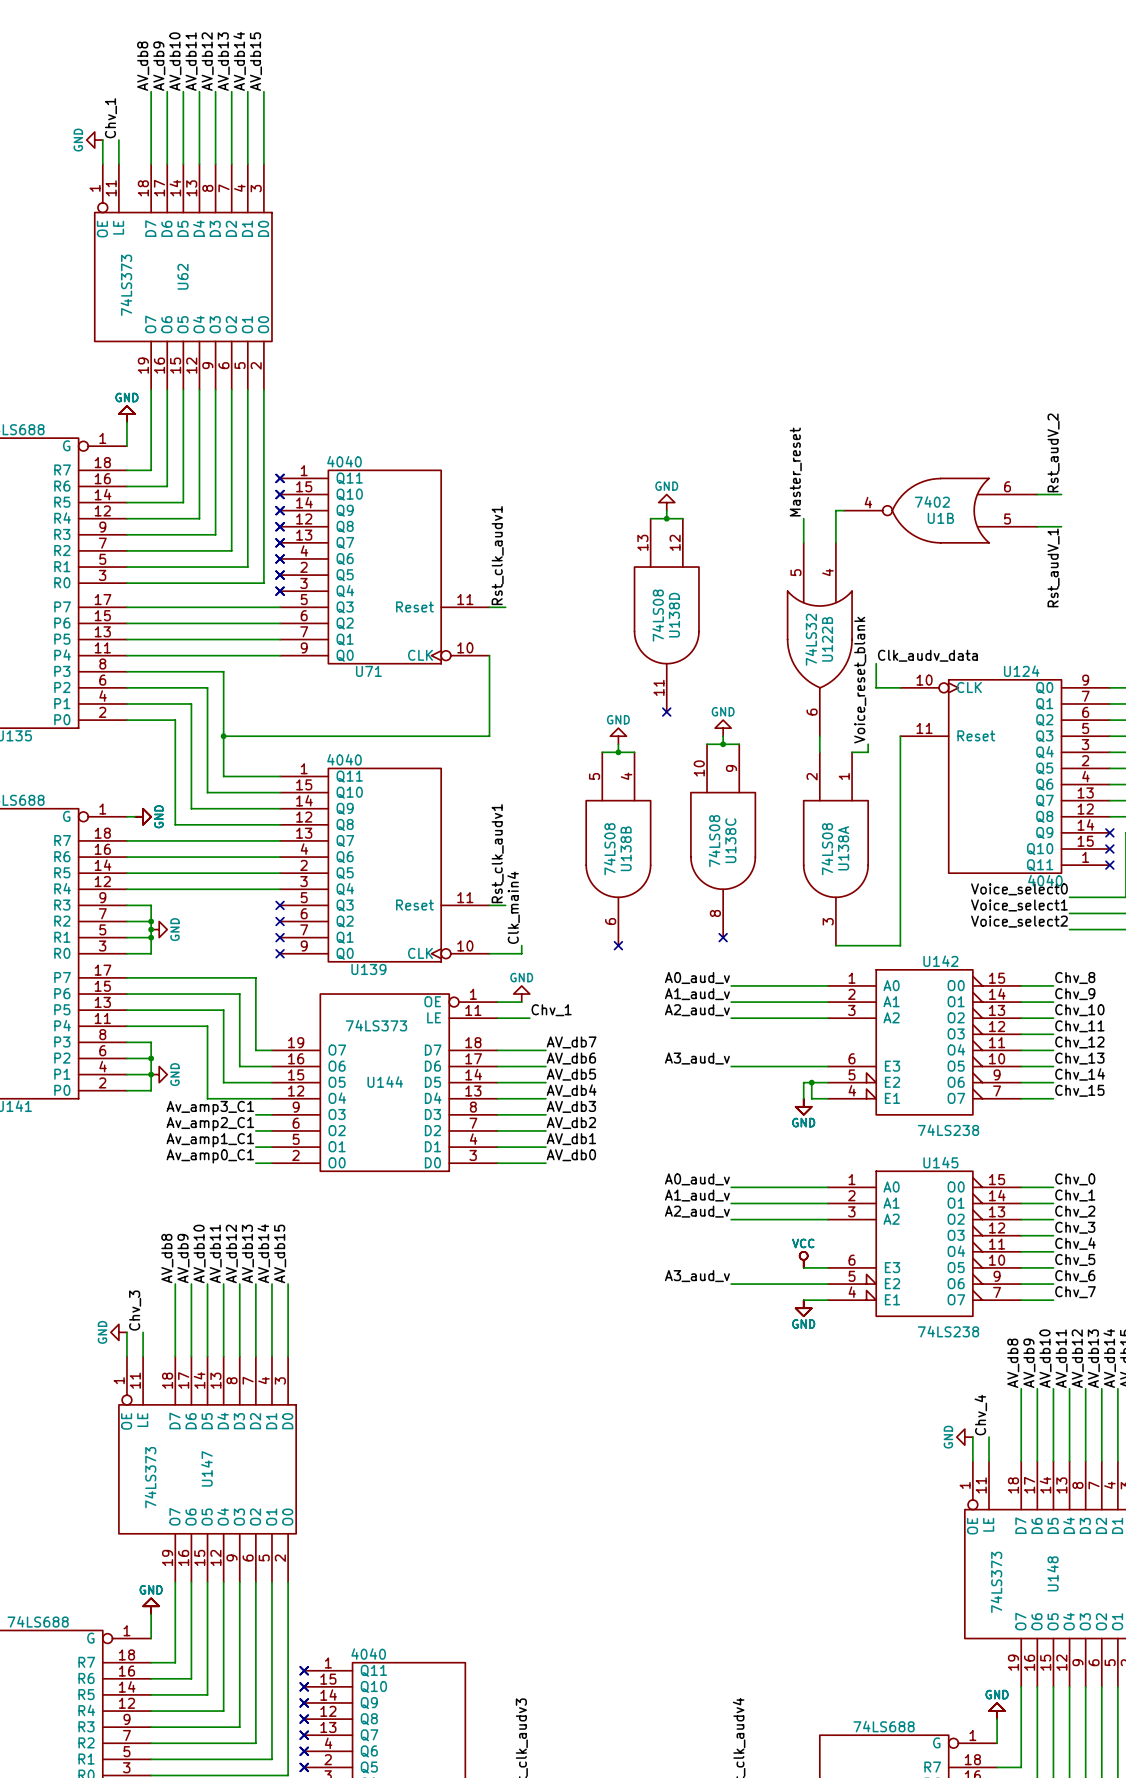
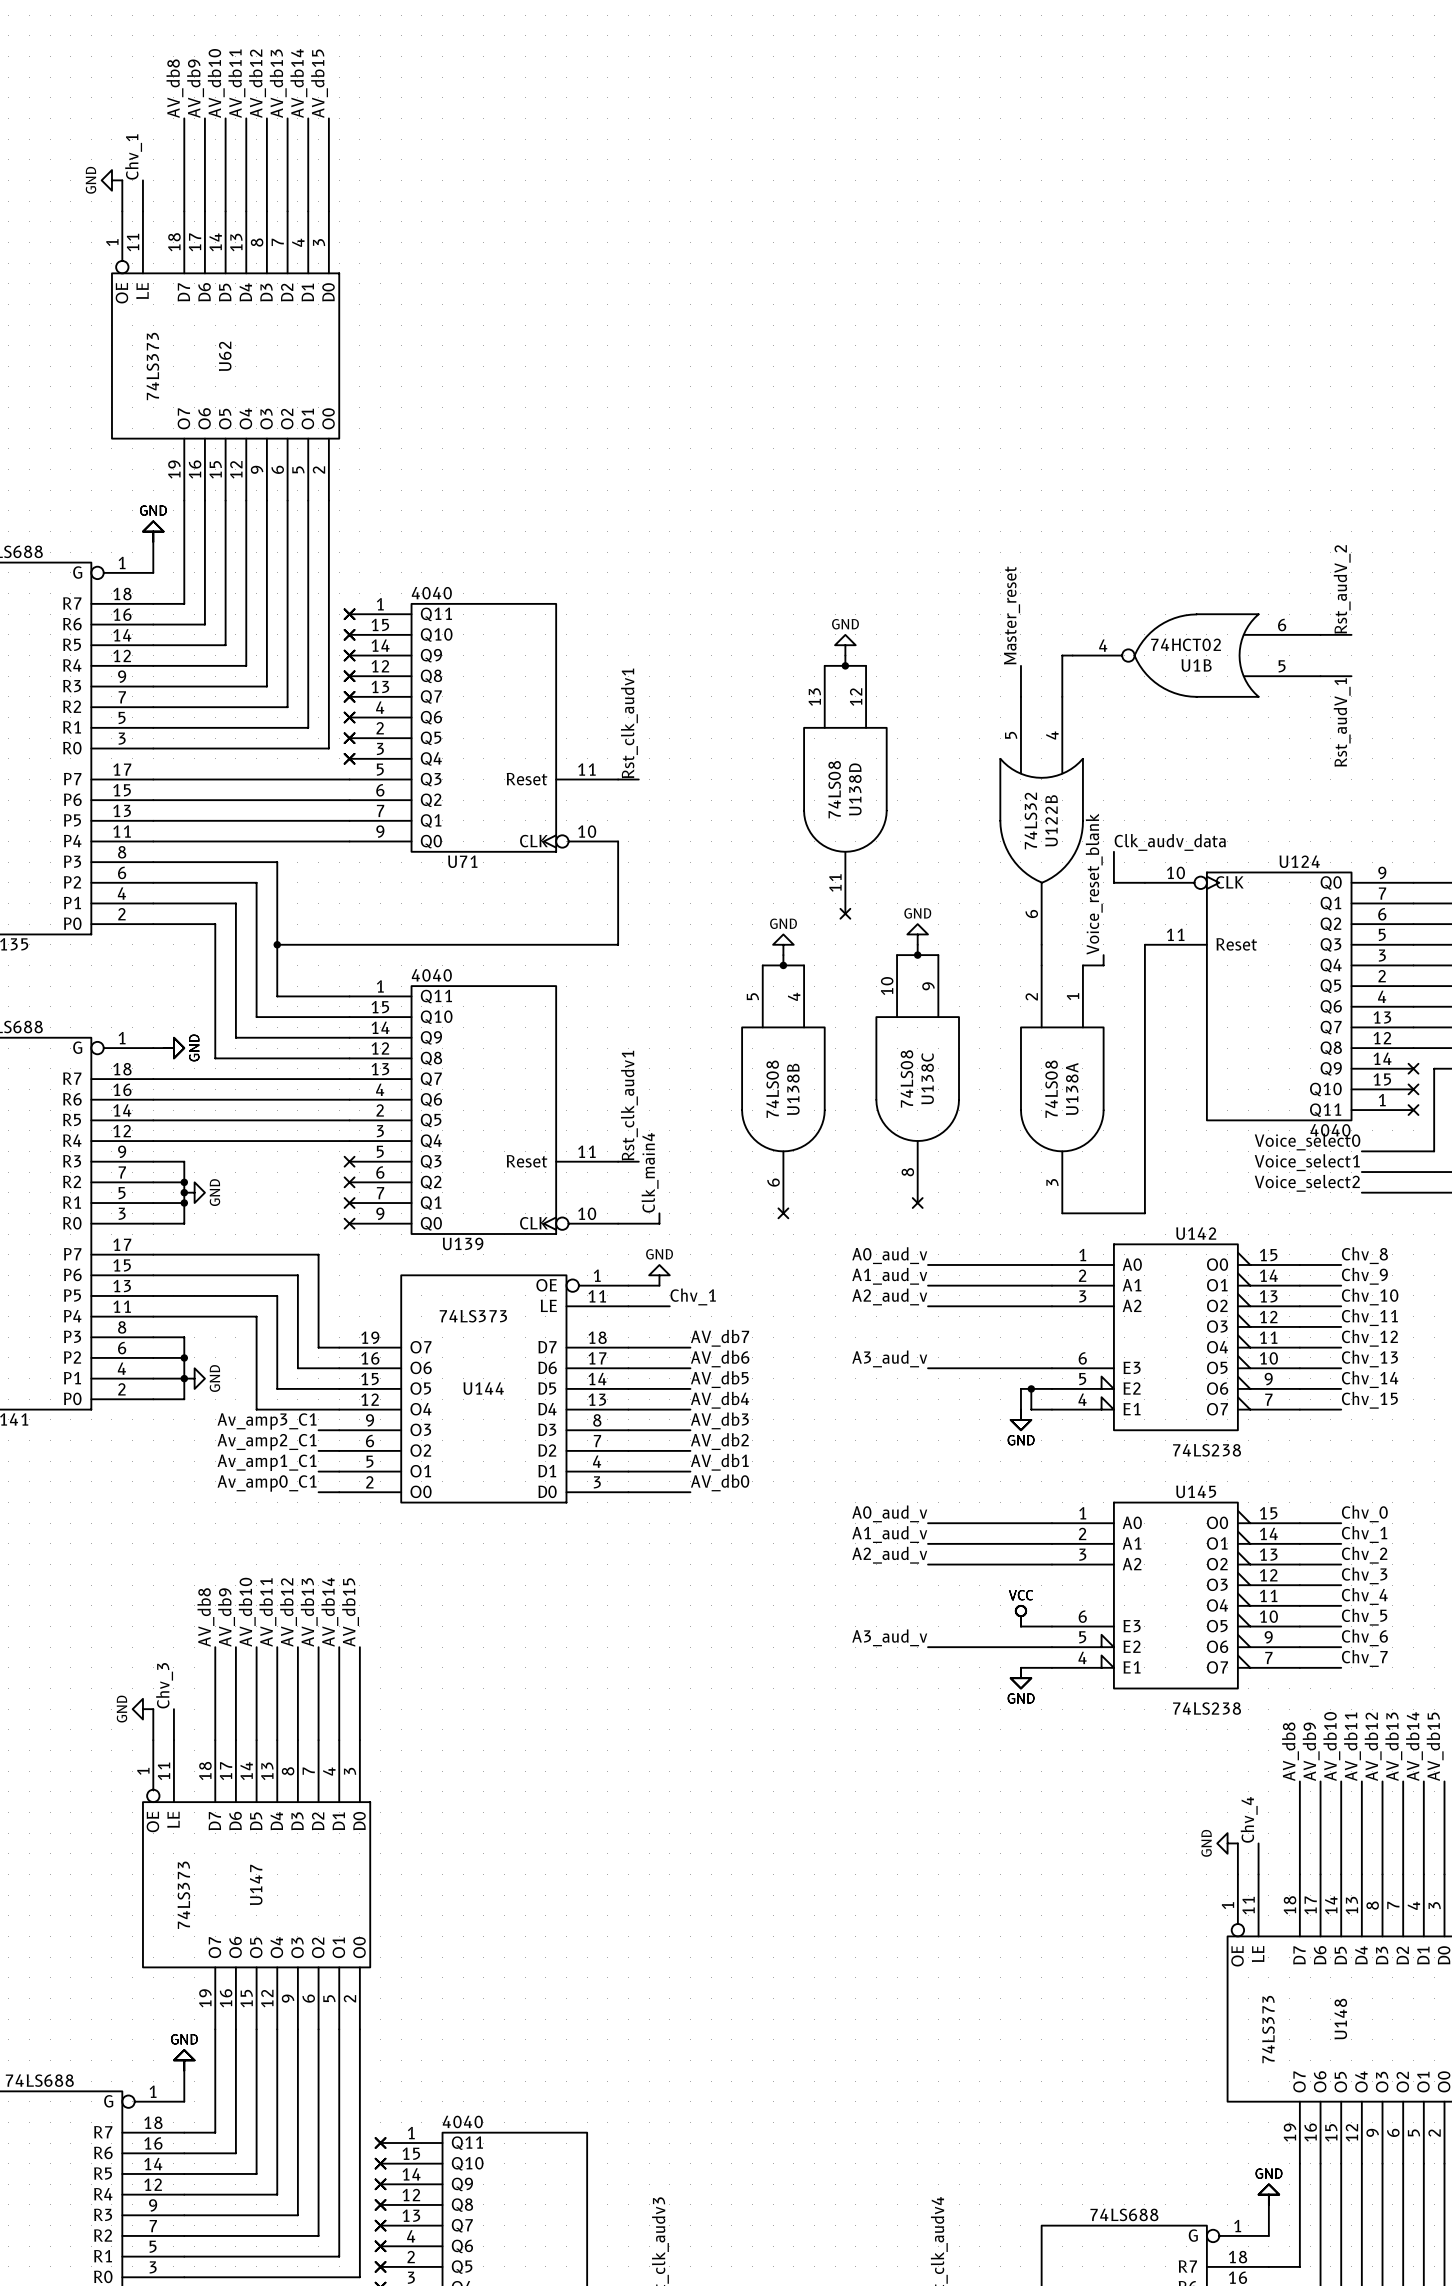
U1B value: 7402 (932, 501) -> 74HCT02 (1186, 644)

